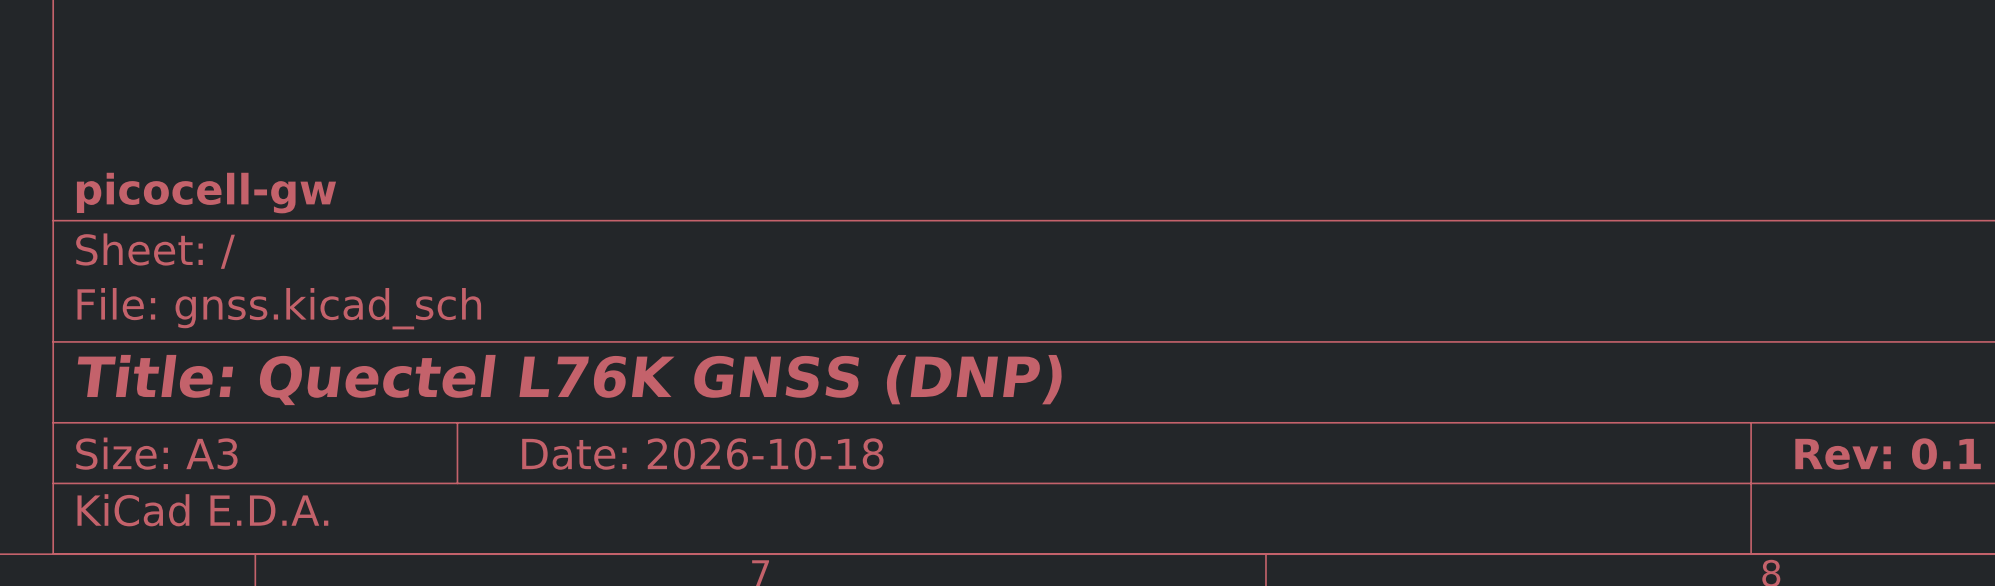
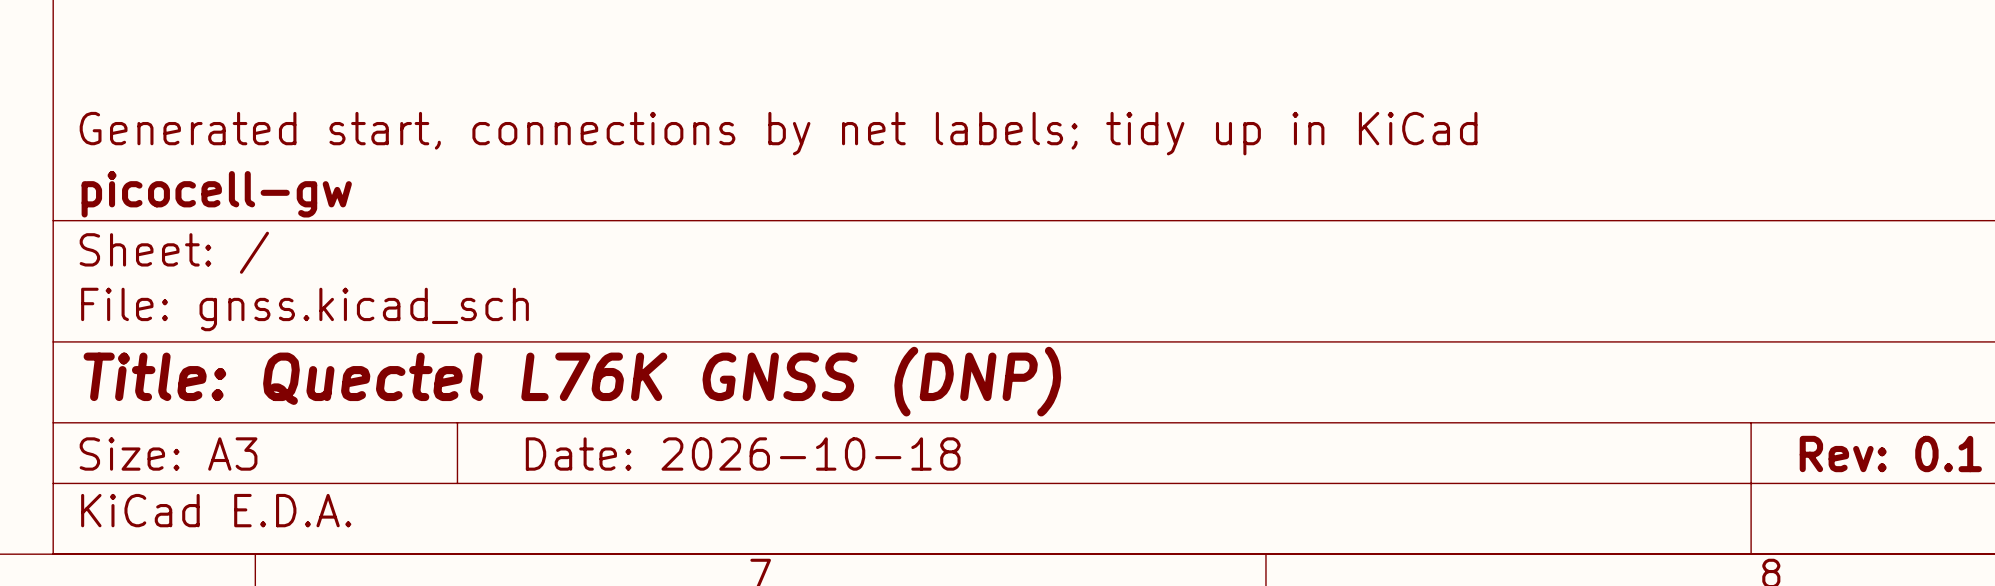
title block: none -> Generated start, connections by net labels; tidy up in KiCad (778, 133)

